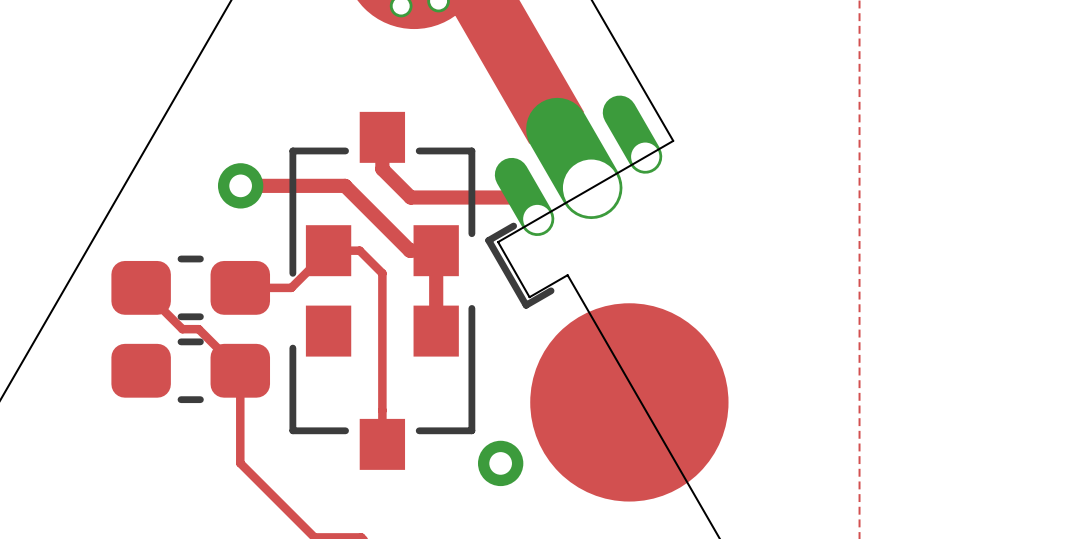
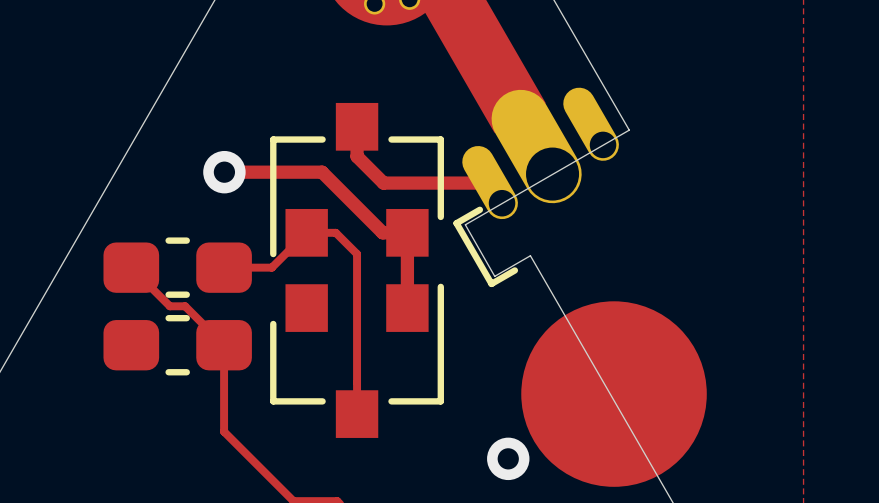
part position: (629, 402) -> (614, 394)
via position: (500, 463) -> (508, 458)

